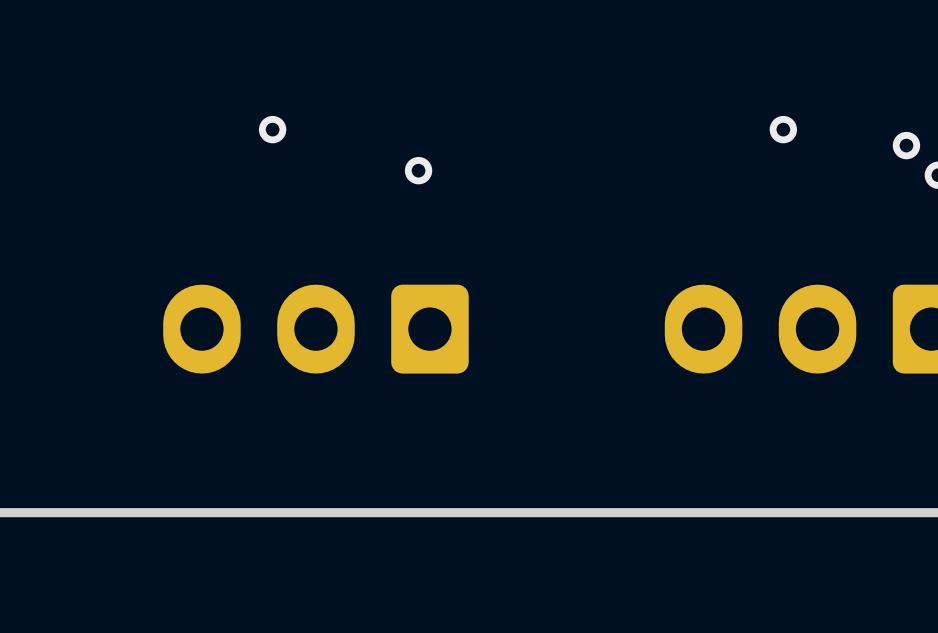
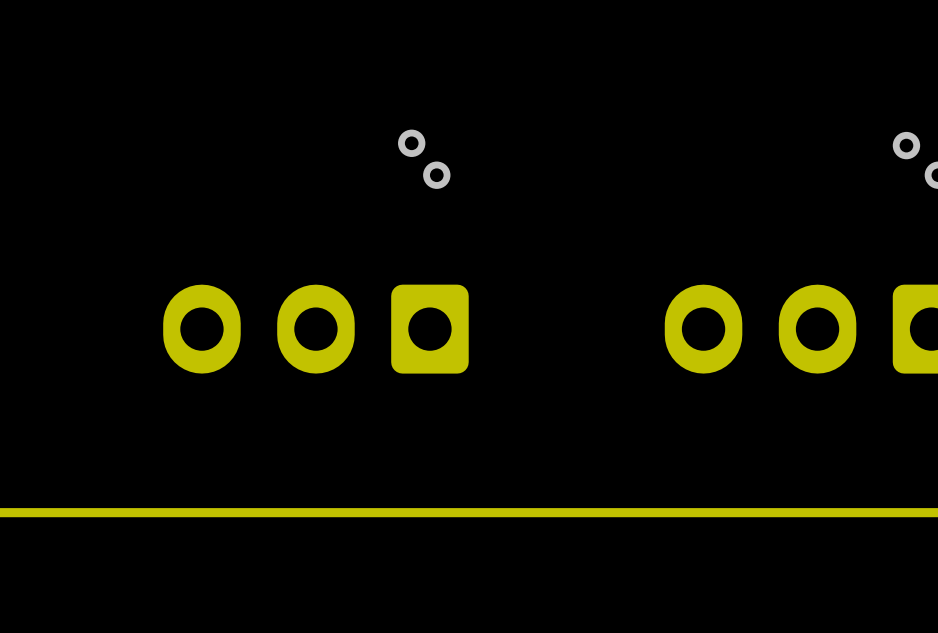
via: (272, 129) -> none
via: (783, 129) -> none
via: none -> (411, 143)
via: (418, 170) -> none
via: none -> (436, 175)

